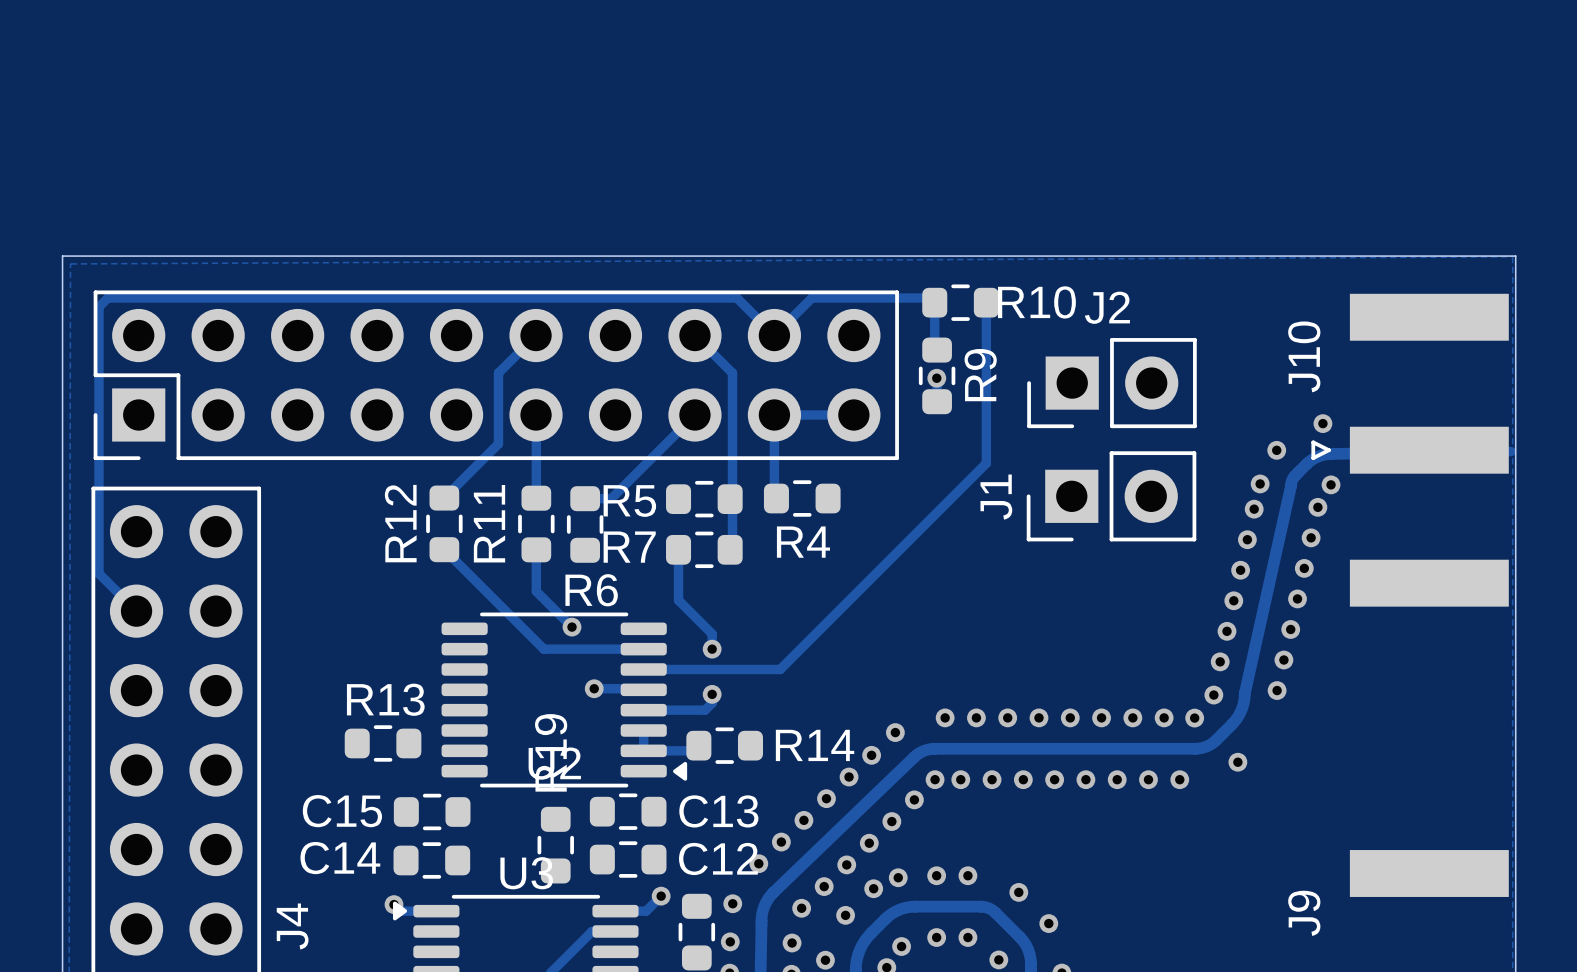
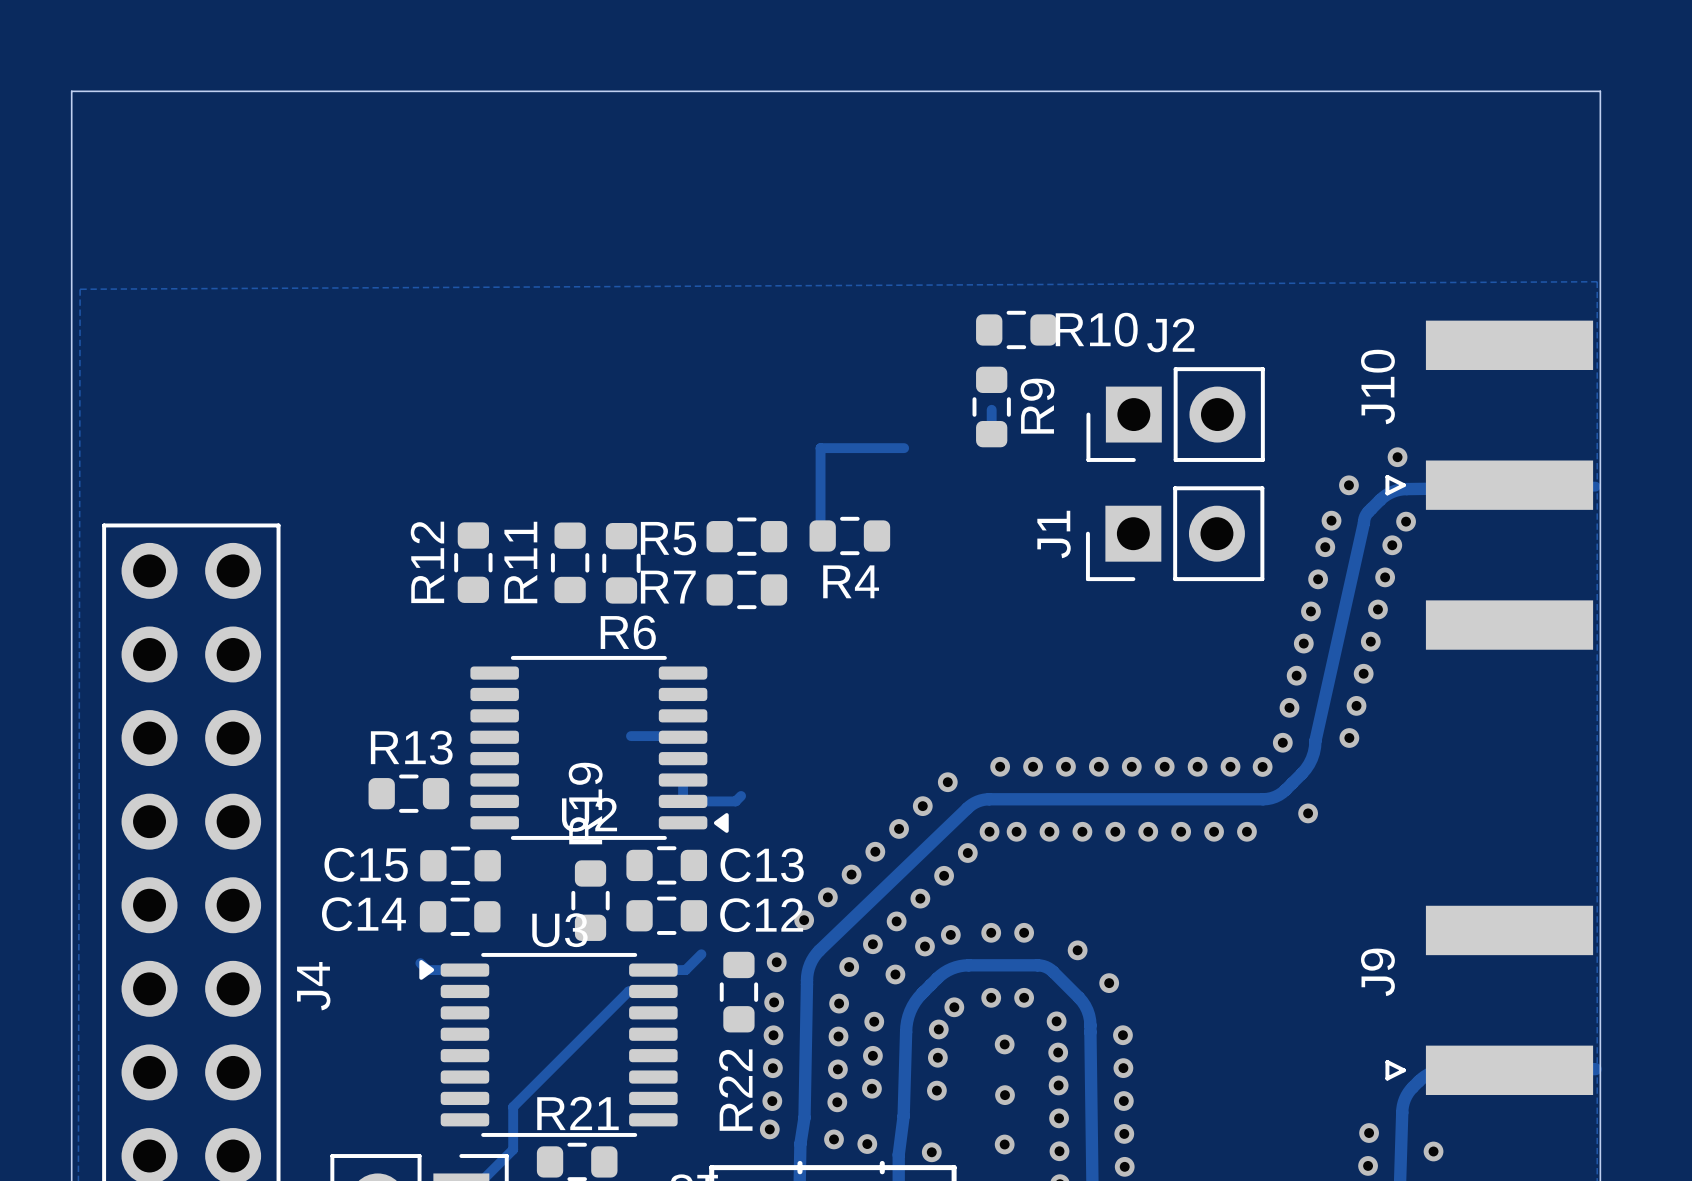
board edge: (62, 256) (1515, 256) -> (71, 280) (71, 91) (1600, 91) (1600, 280)
track: (986, 302) (986, 463) (780, 669) (643, 669) -> none
track: (536, 335) (498, 373) (498, 443) (444, 498) -> none
track: (694, 335) (732, 373) (732, 547) (730, 549) -> none
track: (937, 350) (934, 347) (934, 302) (930, 297) (811, 297) (774, 335) (736, 297) (107, 297) (98, 306) (98, 573) (136, 611) -> none
part: (496, 375) -> none
via: (936, 378) -> none
track: (694, 414) (611, 498) (585, 498) -> none
track: (536, 415) (536, 498) -> none
track: (444, 549) (543, 649) (643, 649) -> none
track: (536, 549) (536, 591) (572, 627) -> none
track: (678, 549) (678, 600) (712, 633) (712, 649) -> none
via: (572, 627) -> none
via: (712, 649) -> none
via: (594, 688) -> none
track: (712, 694) (712, 703) (705, 710) (643, 710) -> none
via: (712, 694) -> none
R14: (724, 745) -> none
via: (661, 896) -> none
via: (394, 904) -> none

